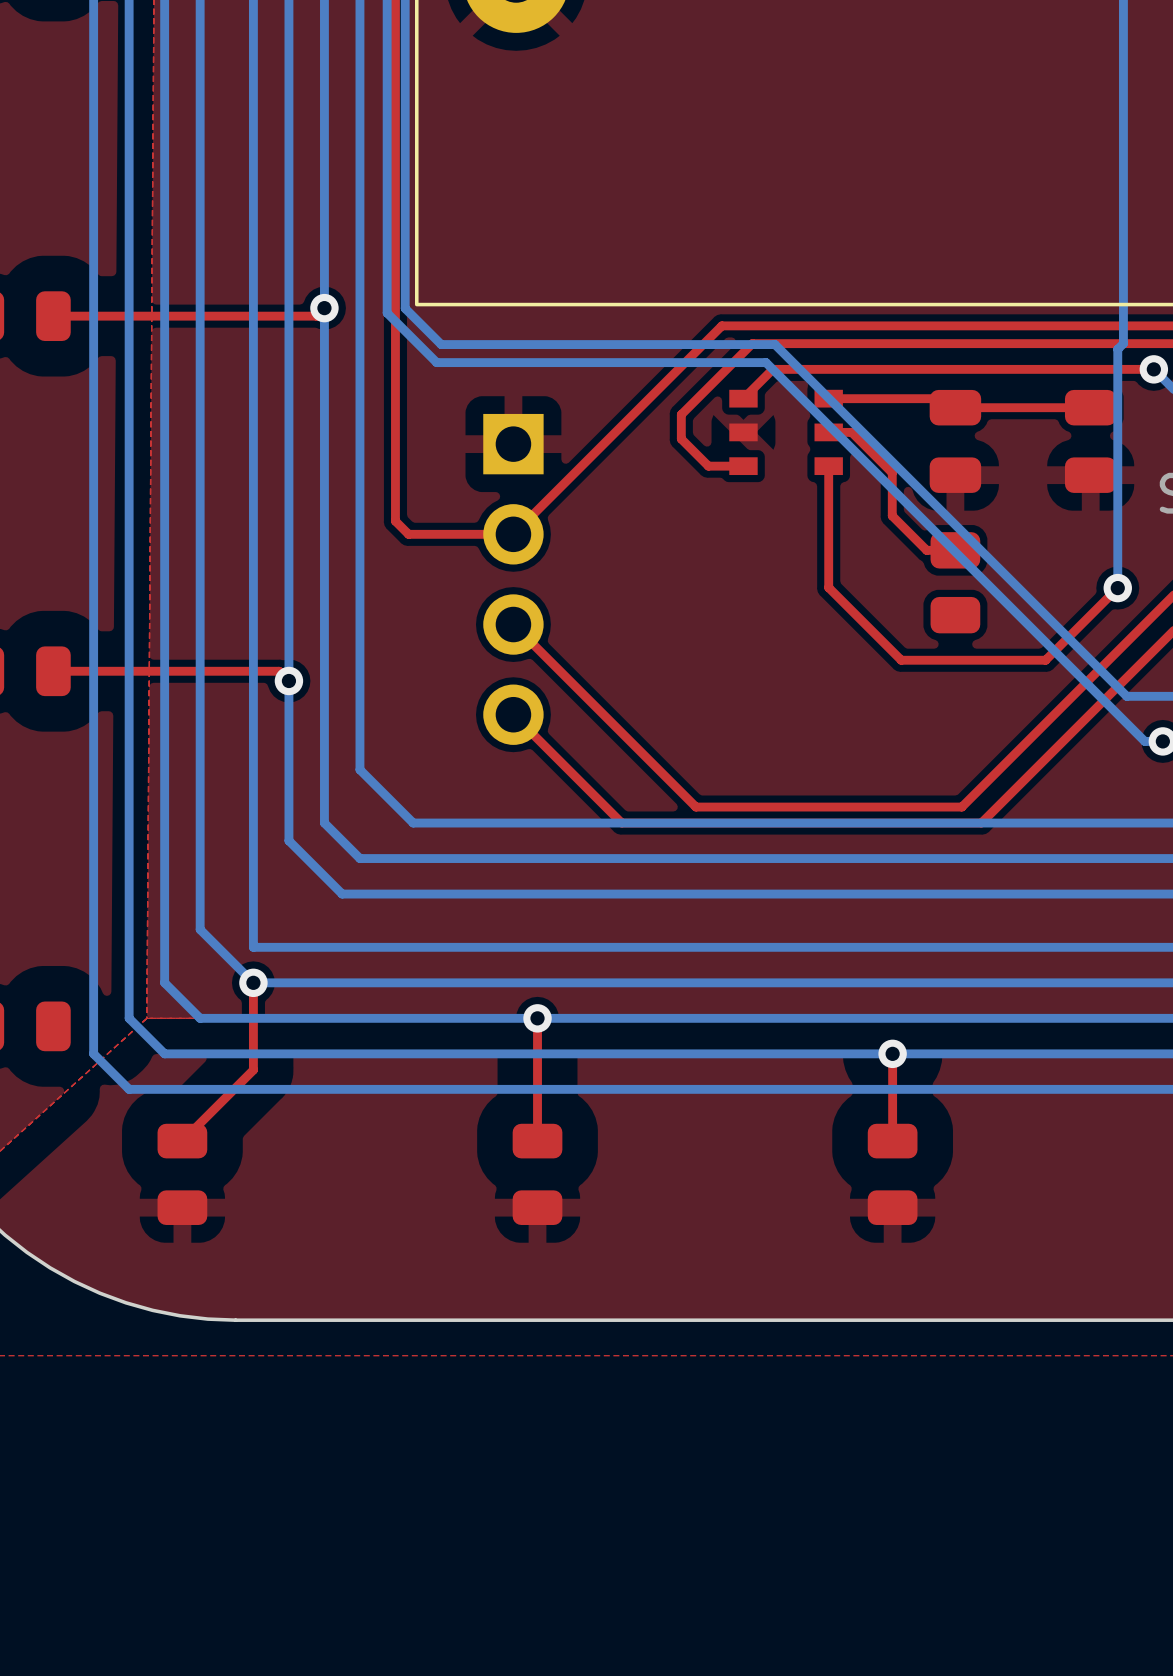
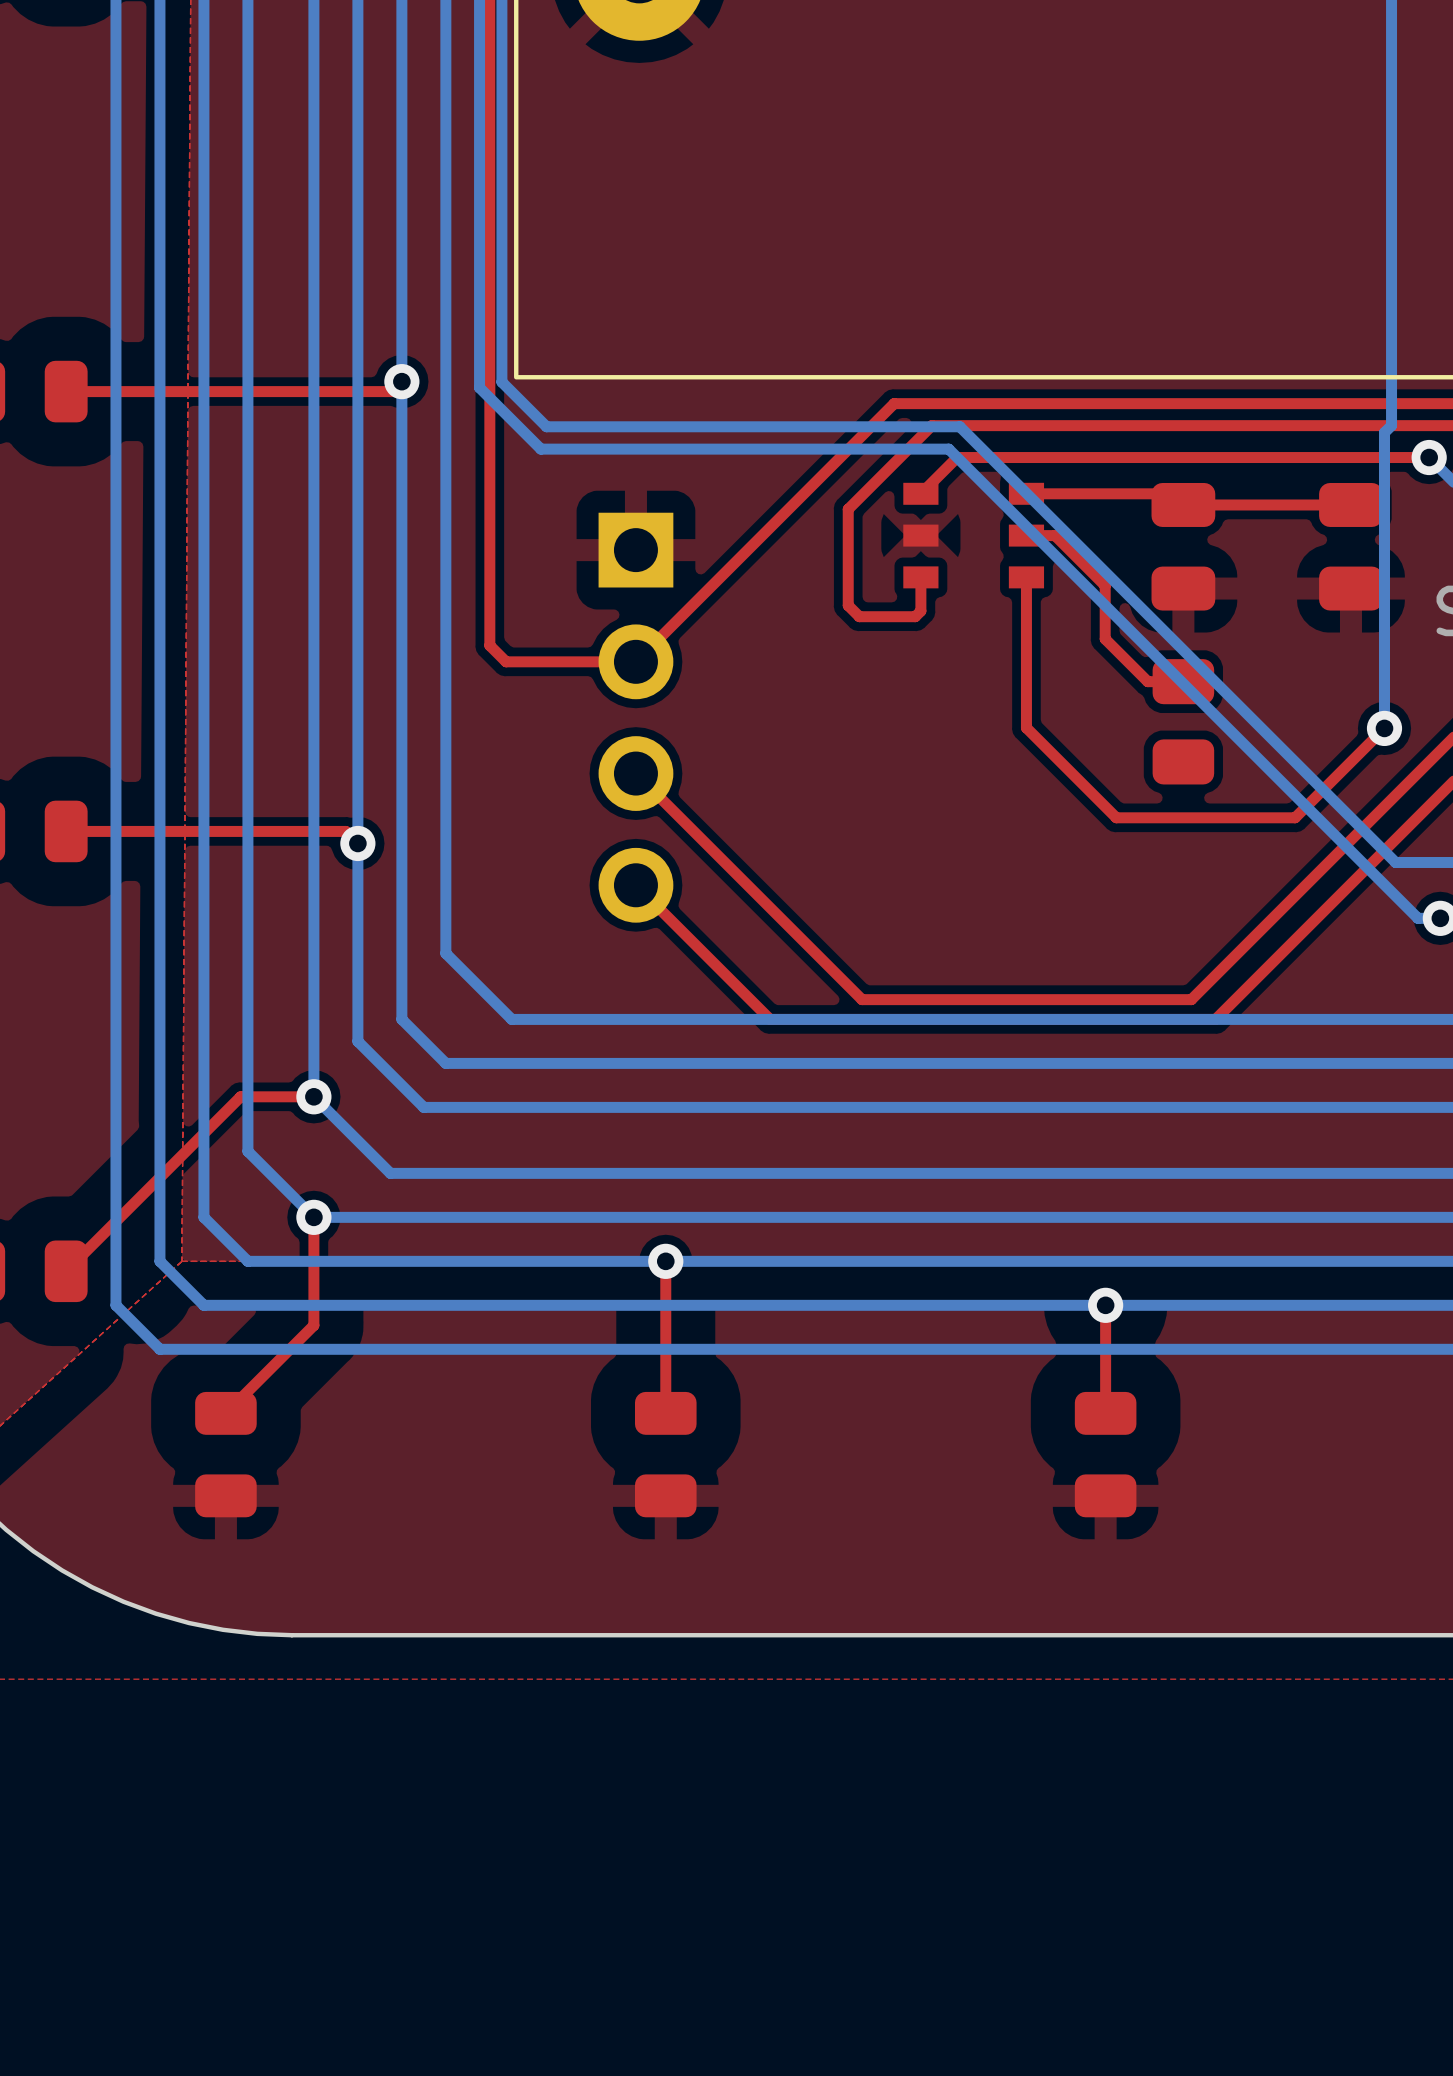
top track: (684, 411) (681, 414) (681, 439) (708, 466) (743, 466) -> (848, 509) (848, 605) (859, 616) (915, 616) (920, 611) (920, 577)
top track: none -> (313, 1096) (240, 1096) (66, 1271)
bottom track: (253, 885) (253, 947) (315, 947) -> (313, 1096) (390, 1173)
via: none -> (313, 1096)

